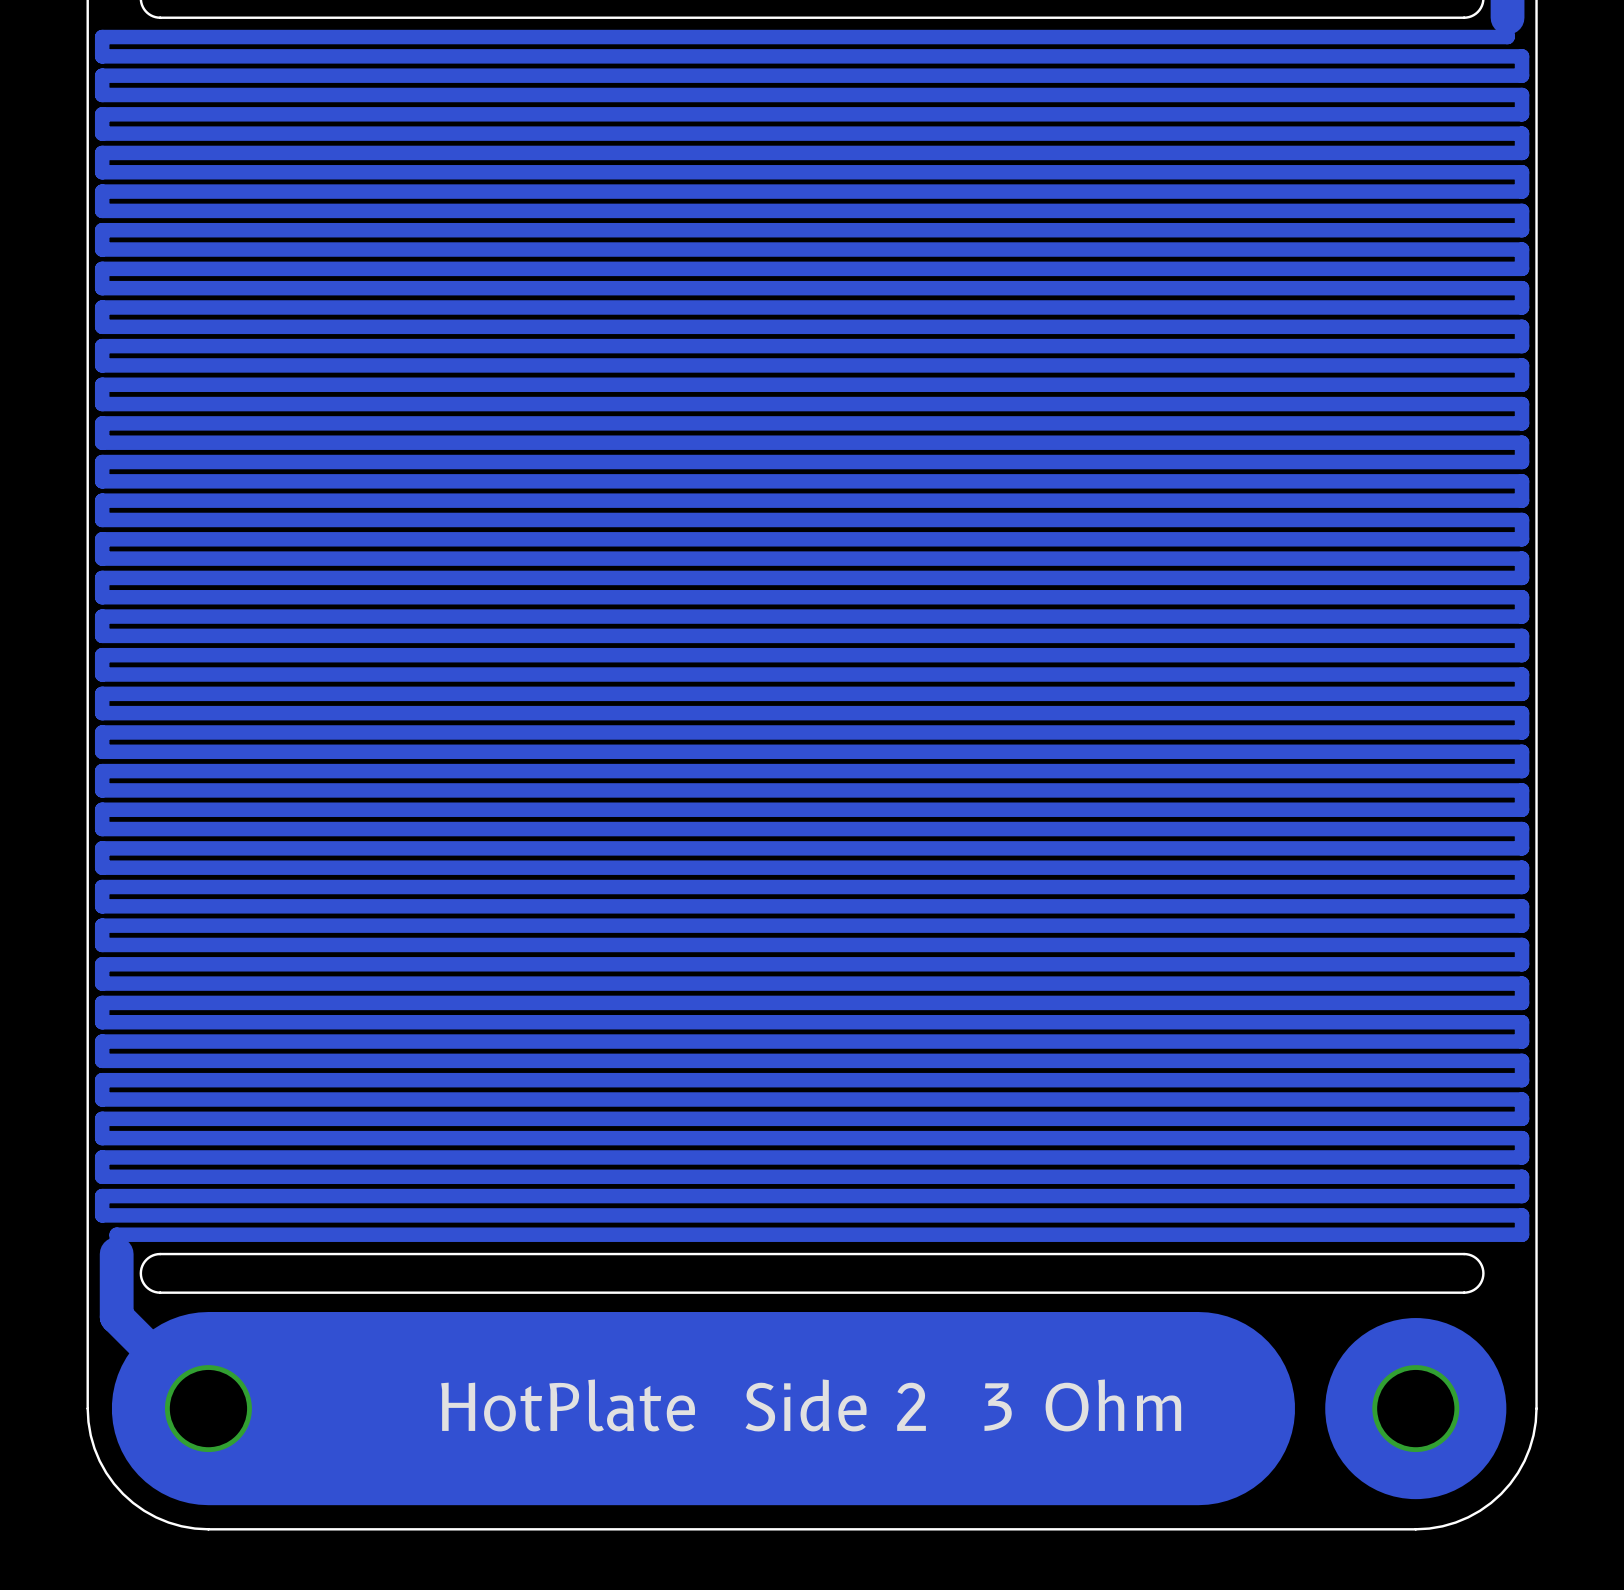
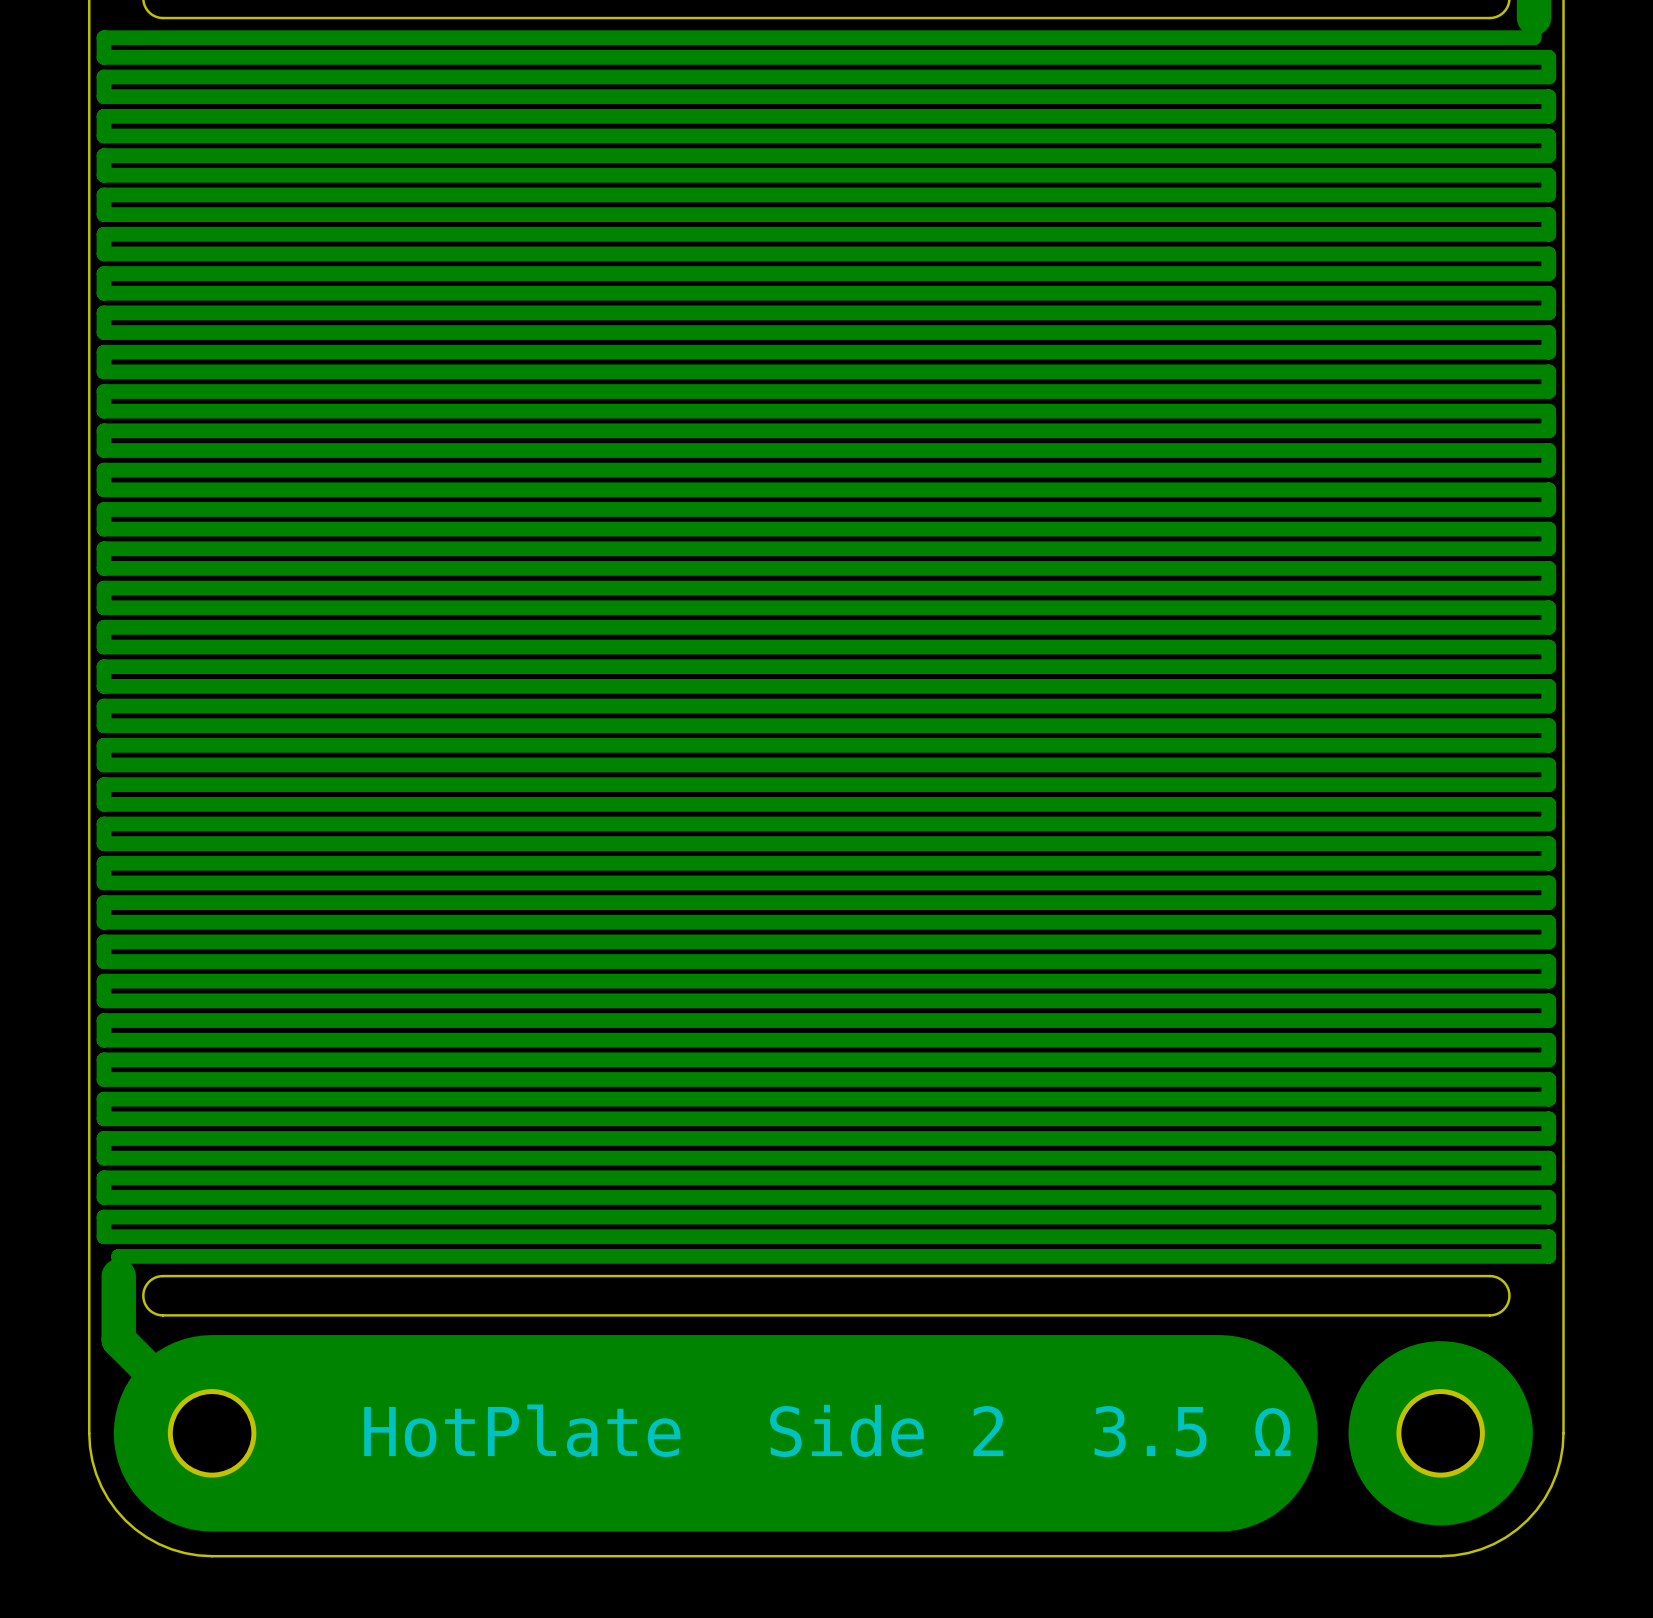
text: HotPlate Side 2 3 Ohm (811, 1405) -> HotPlate Side 2 3.5 Ω (827, 1430)

